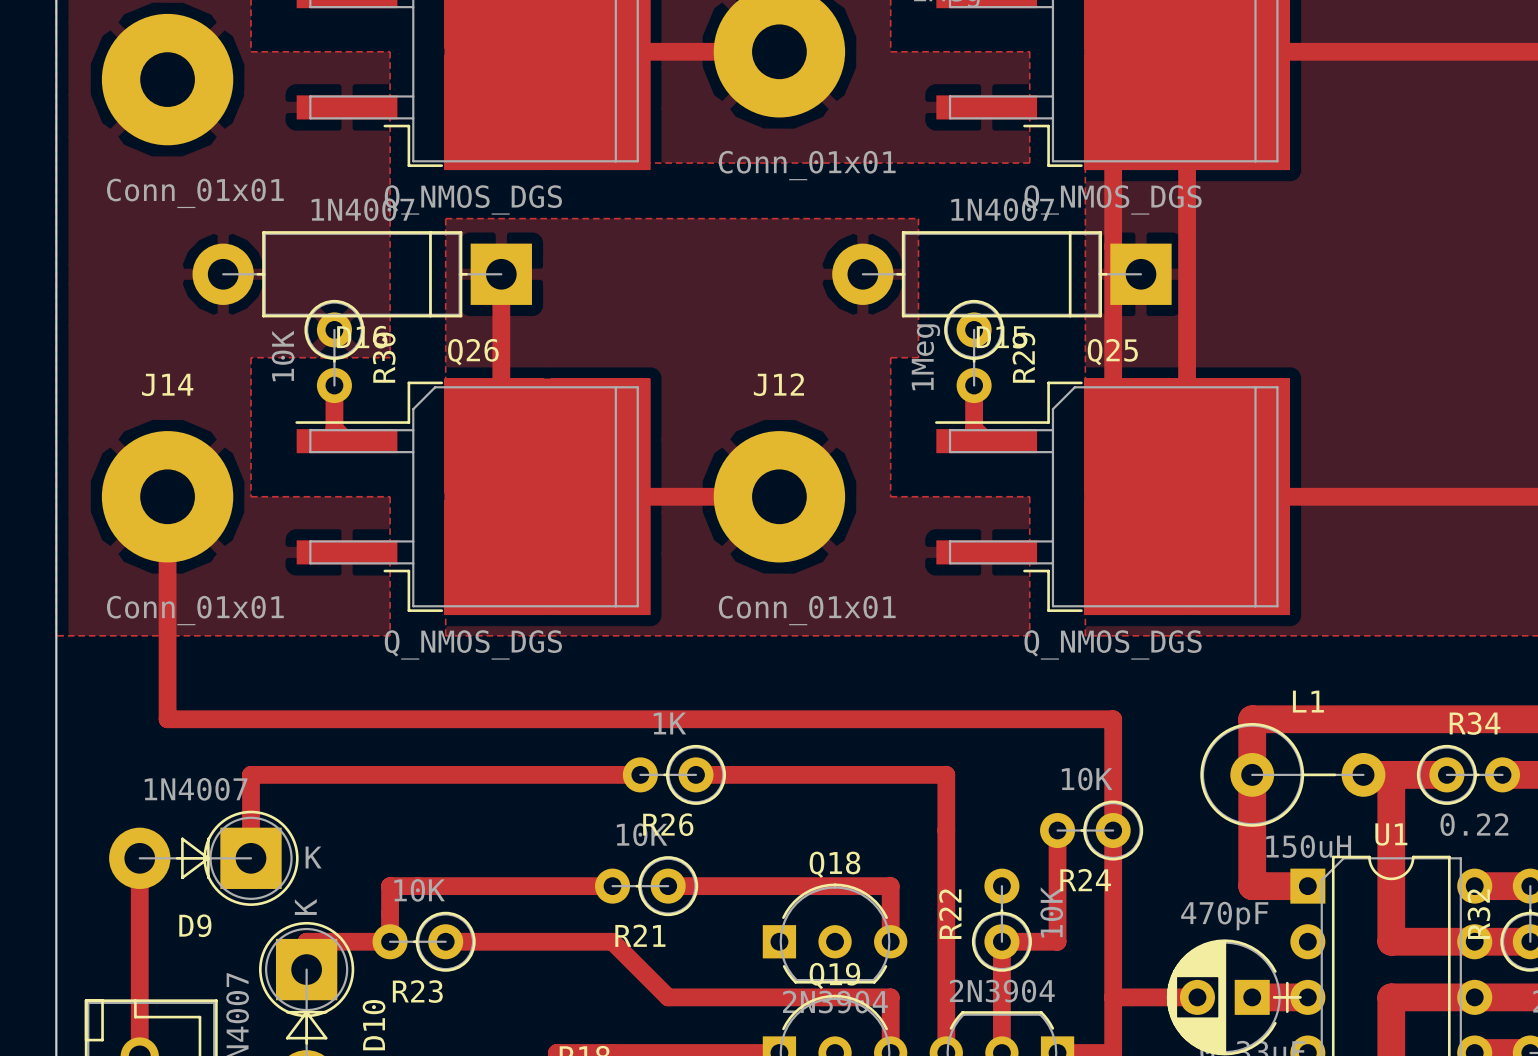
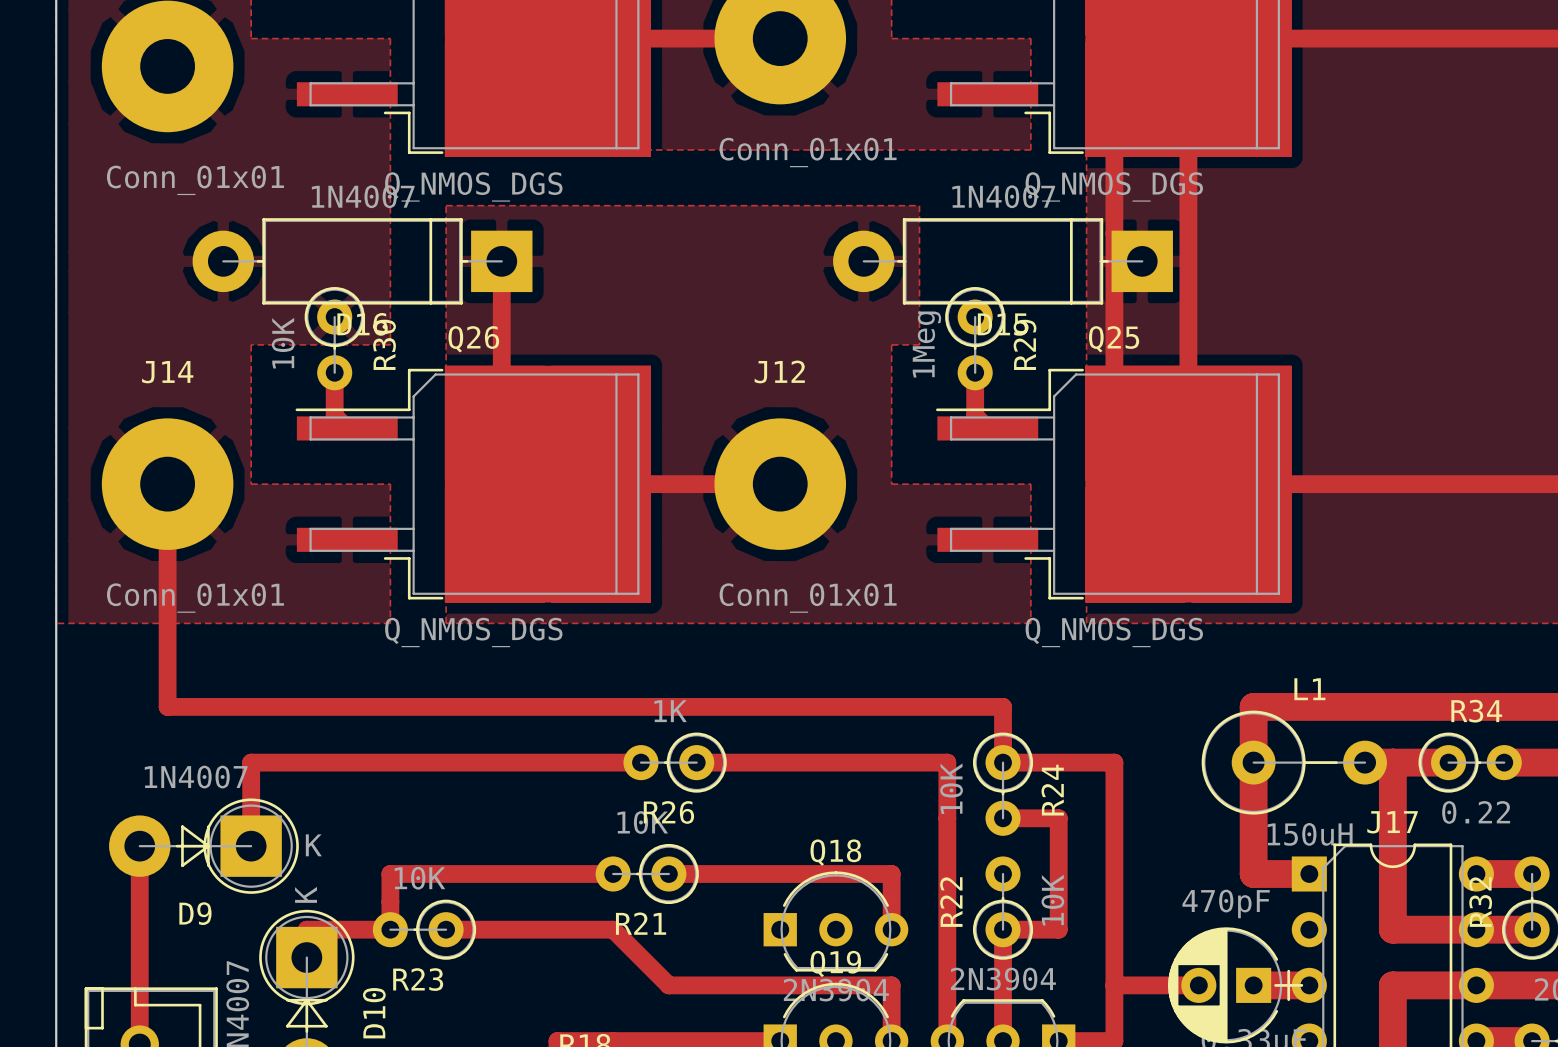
track: (1001, 719) (1113, 719) (1113, 774) -> (1003, 706) (1003, 762) (1114, 762)
track: none -> (1003, 818) (1058, 818)
R24 rotation: 0° (1091, 830) -> 90° counterclockwise (1003, 784)
R24 position: (1091, 830) -> (1003, 784)
U1 name: U1 (1391, 834) -> J17 (1392, 822)

